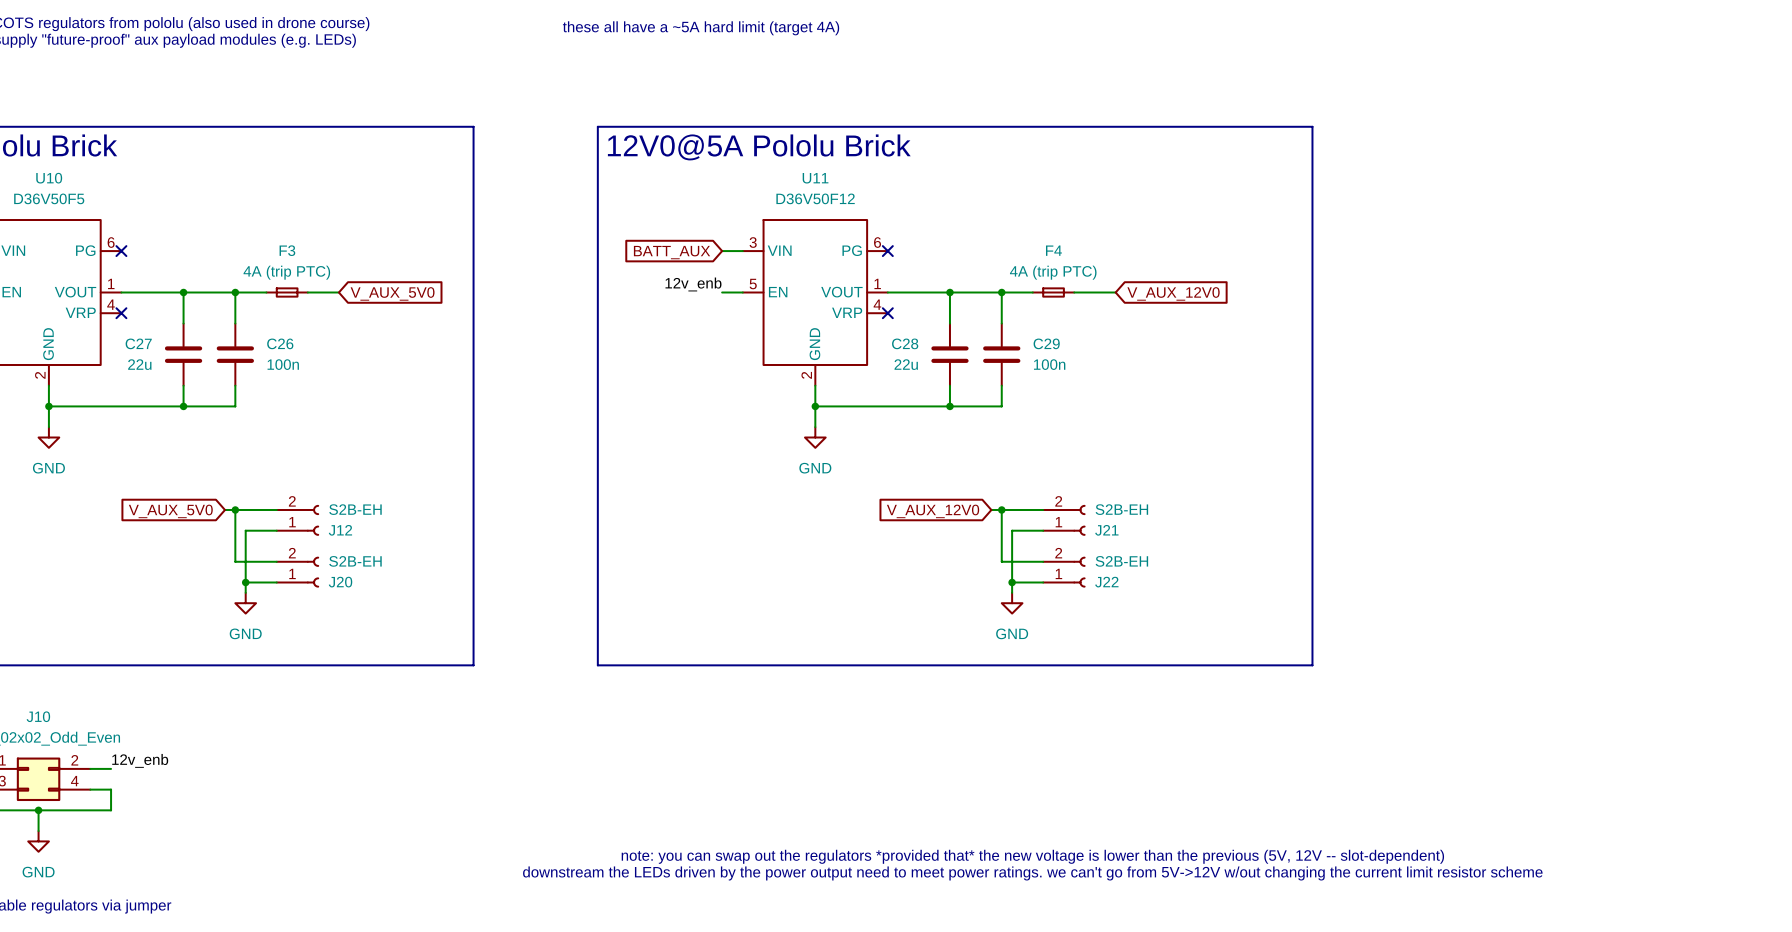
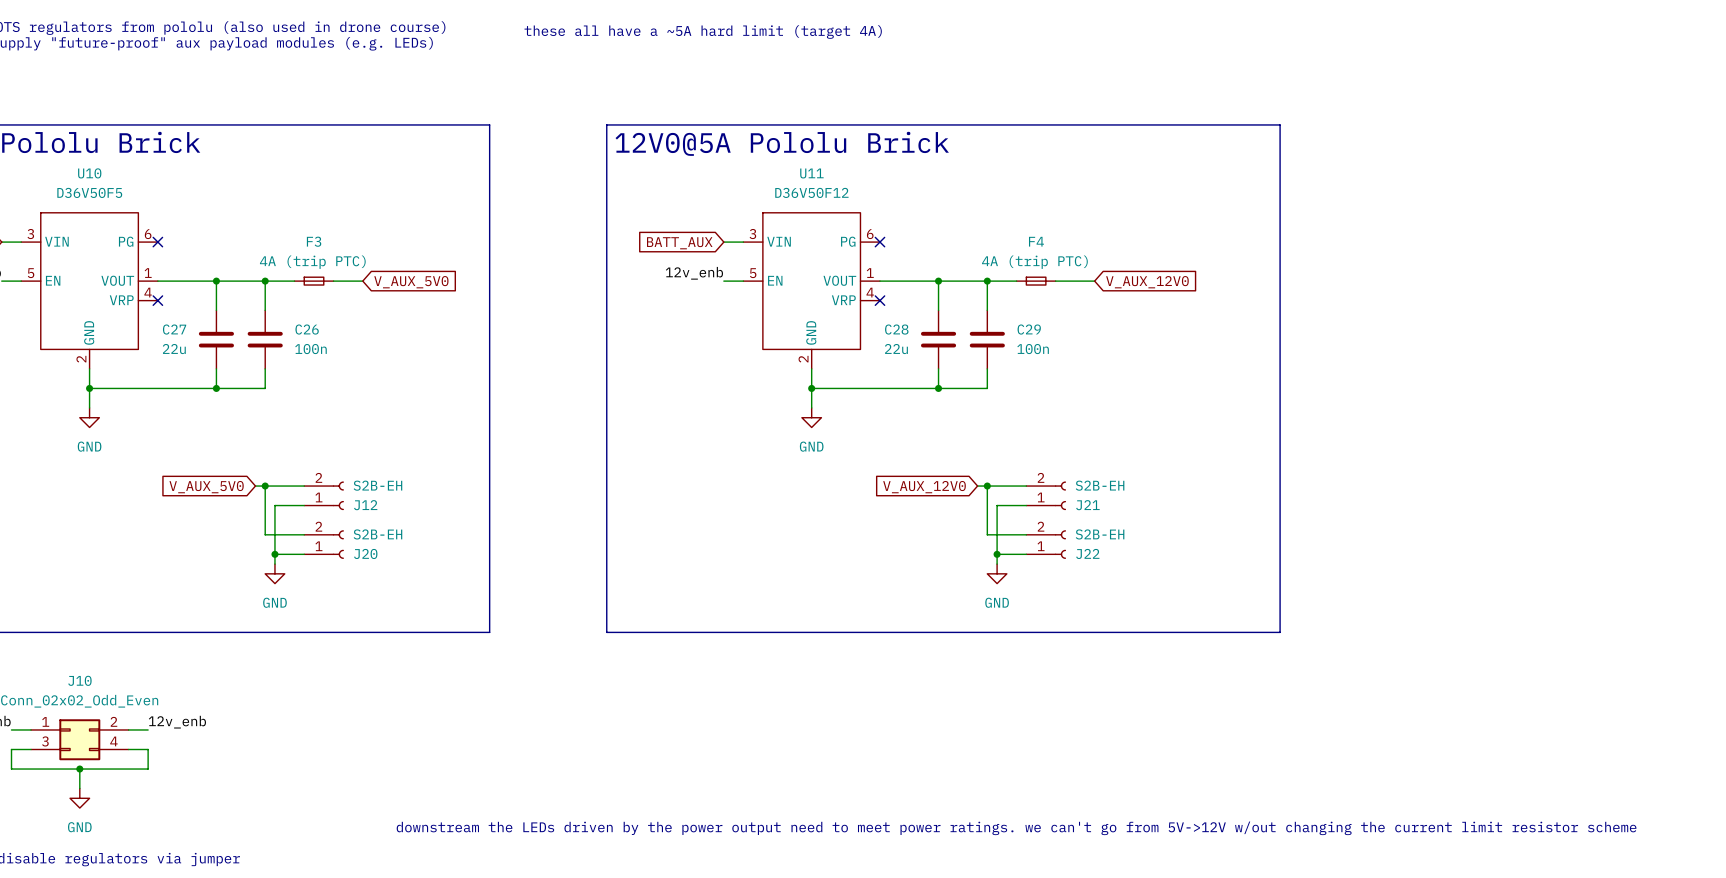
text: note: you can swap out the regulators *provided that* the new voltage is lower than the previous (5V, 12V -- slot-dependent) (1032, 856) -> none

